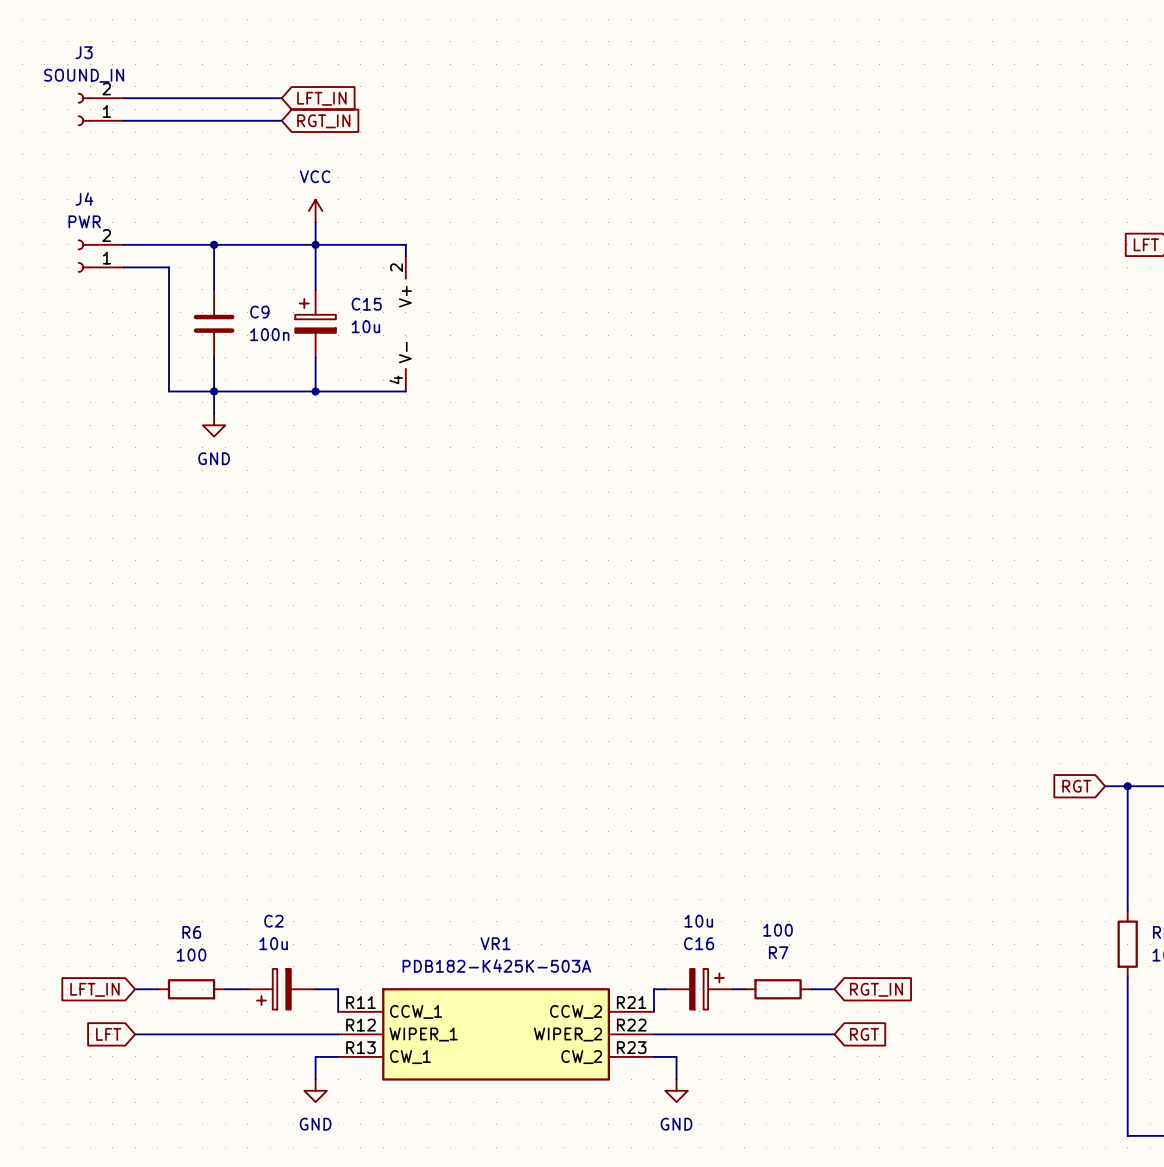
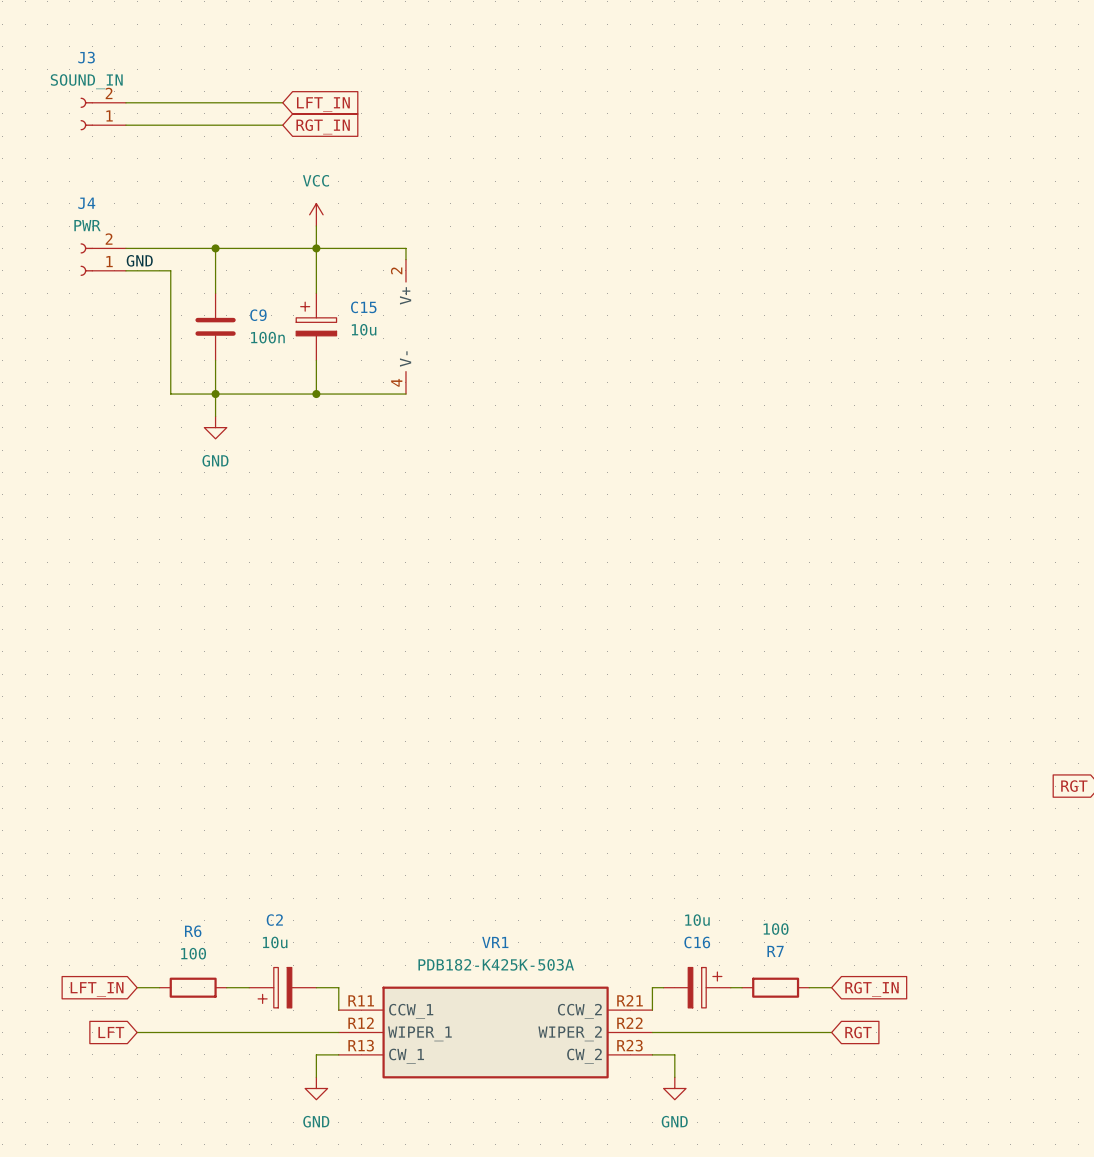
label: none -> GND (139, 260)

